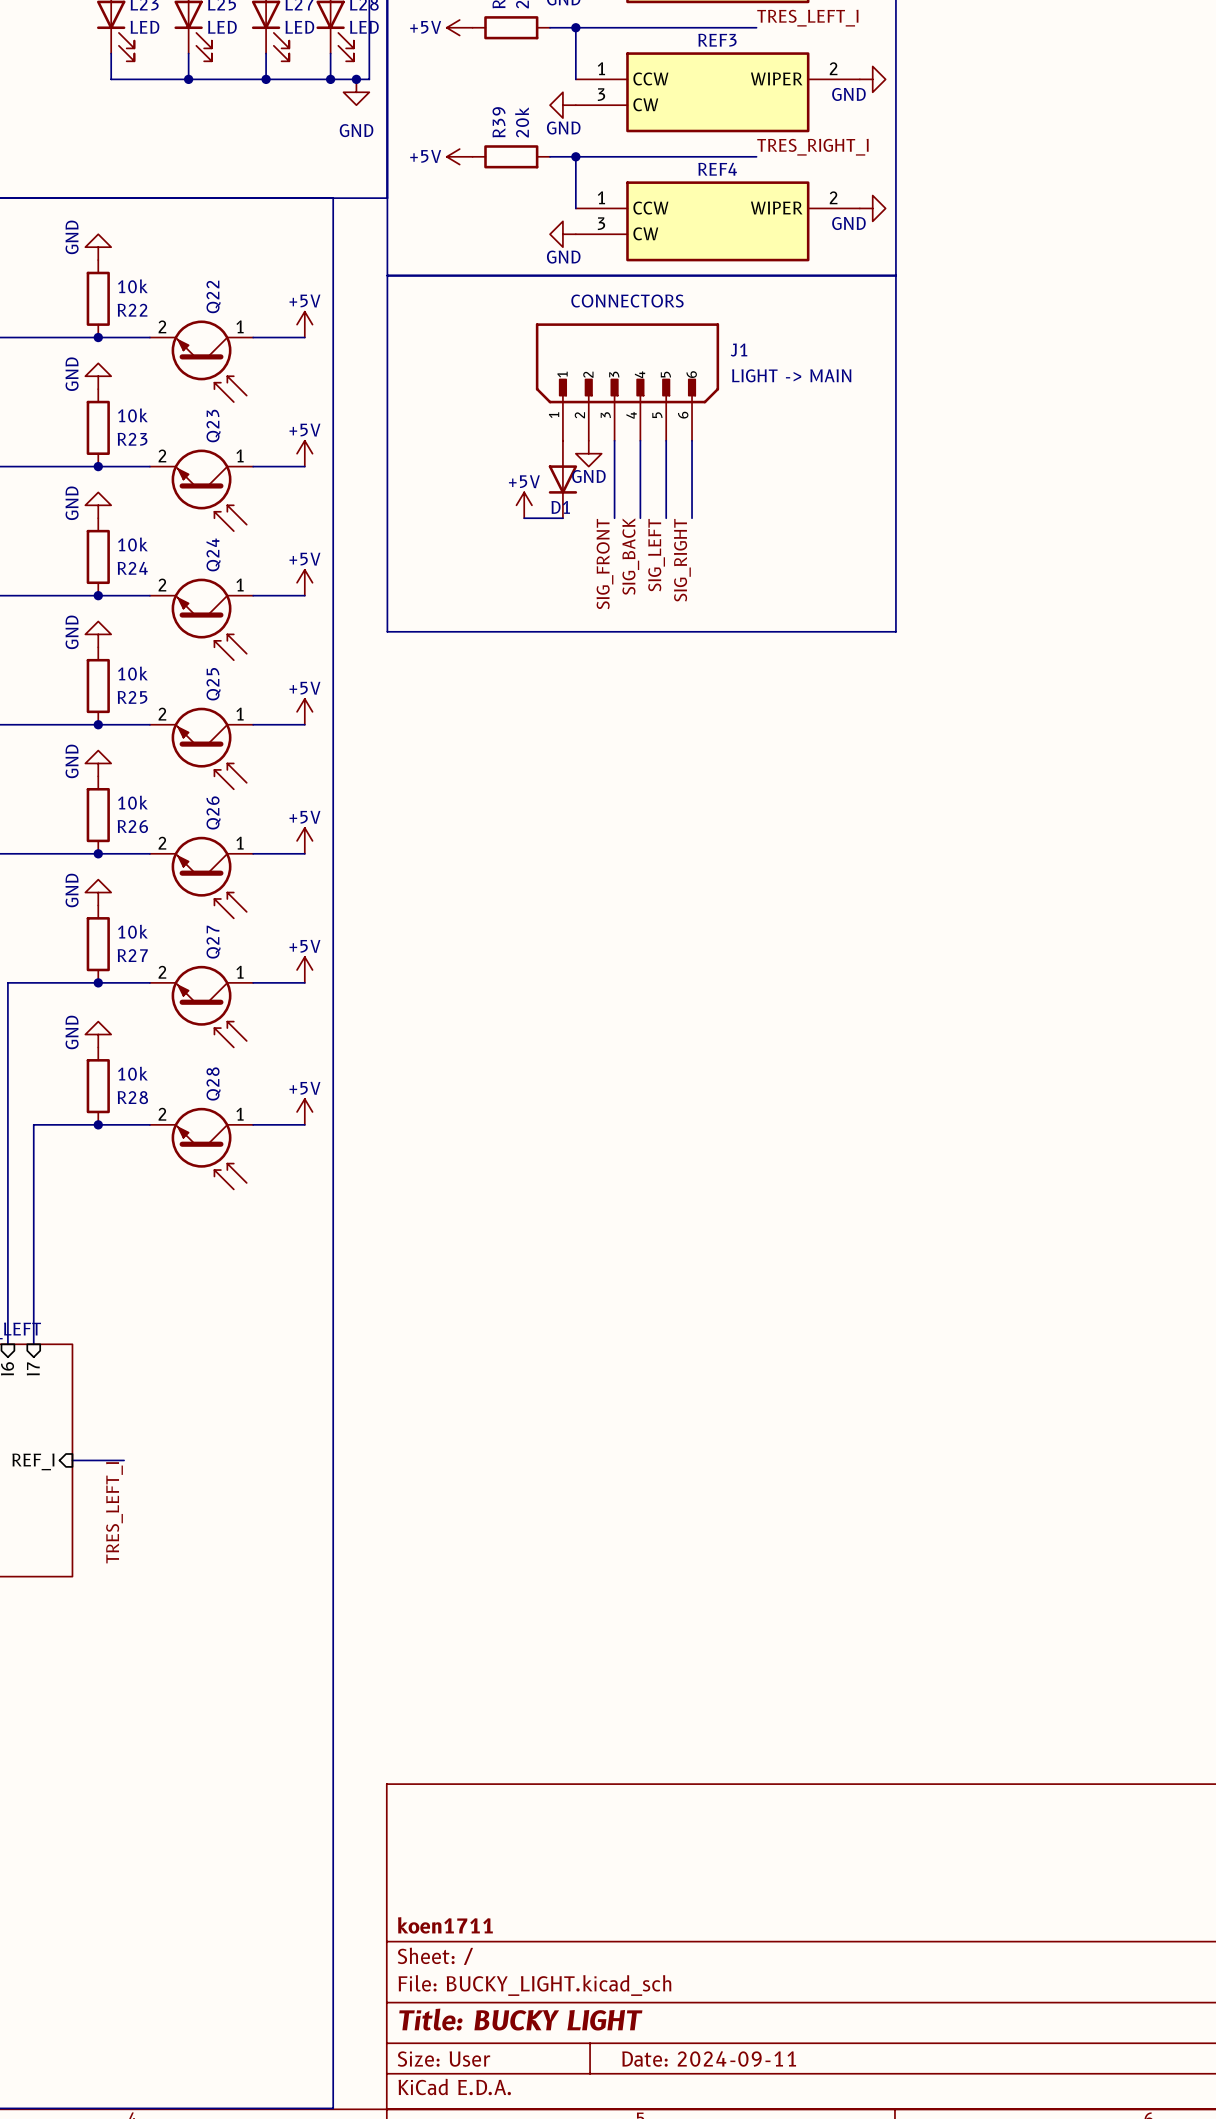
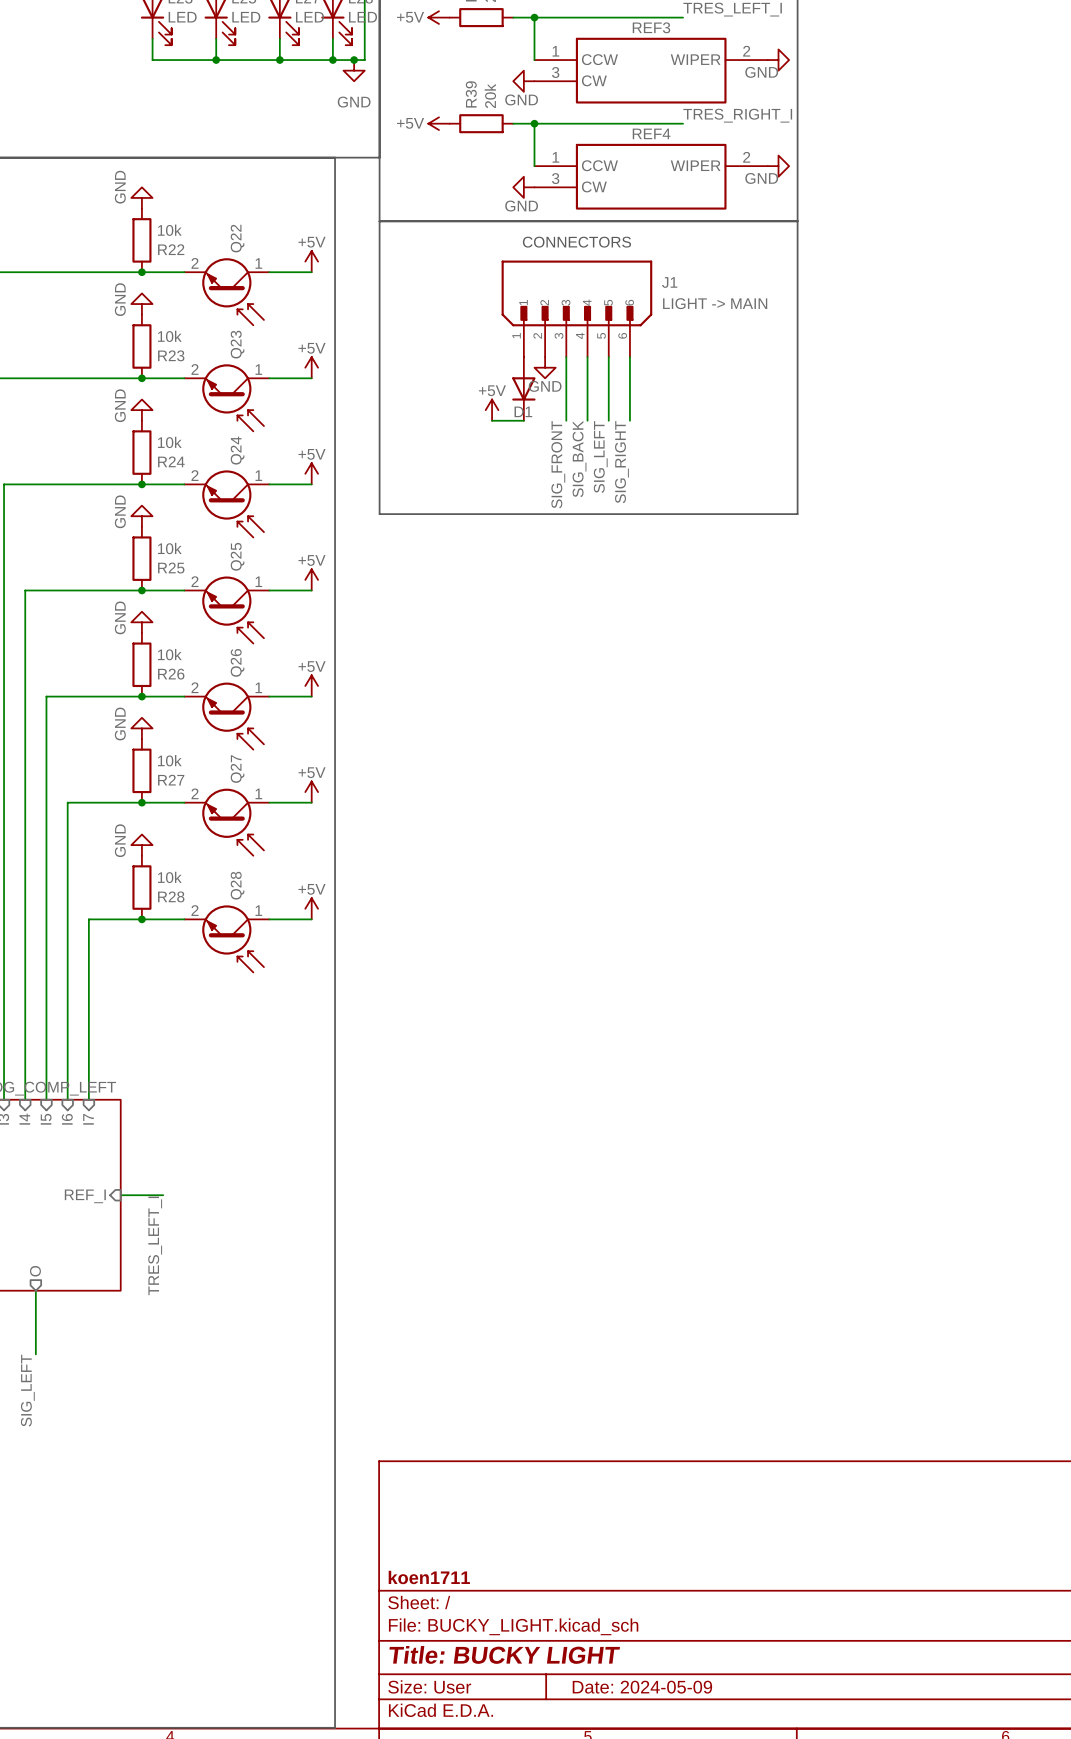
title block: Date: 2024-09-11 (709, 2059) -> Date: 2024-05-09 (642, 1687)

